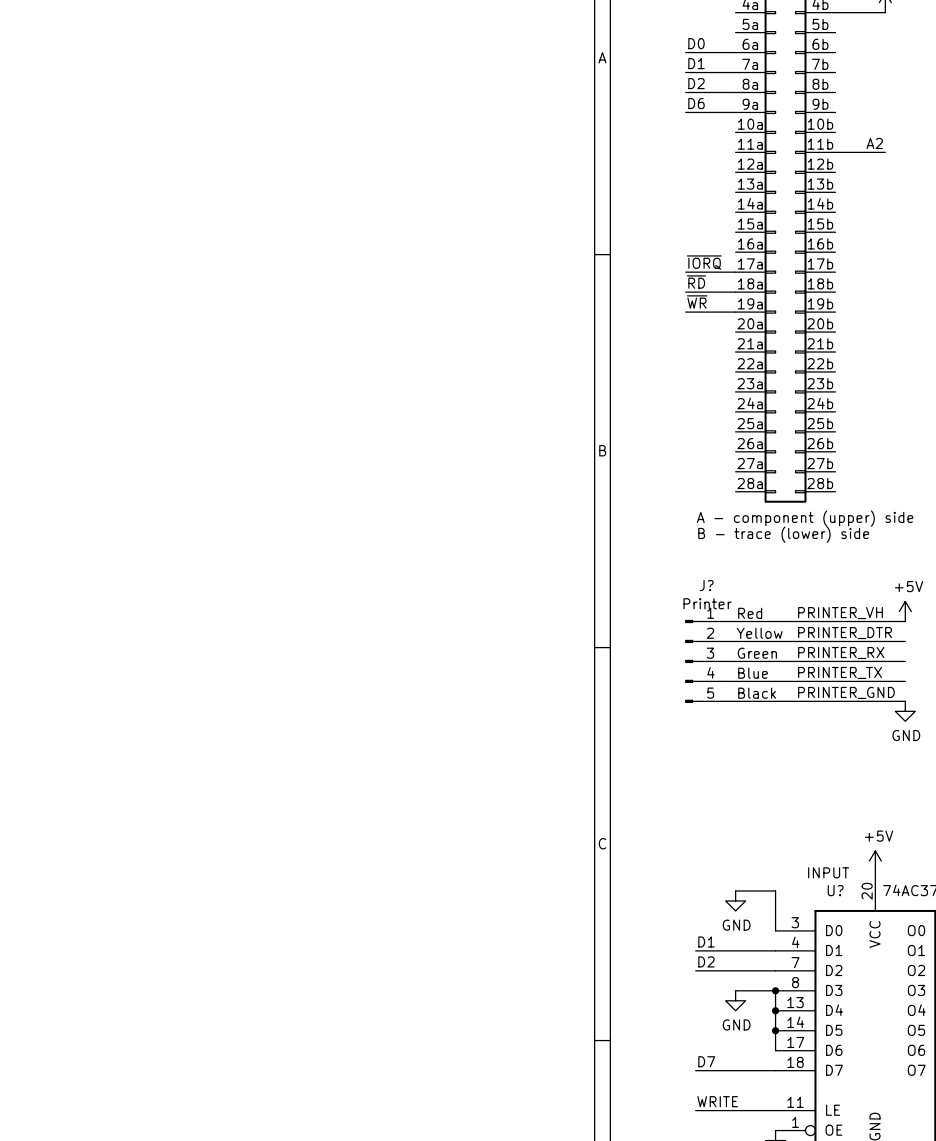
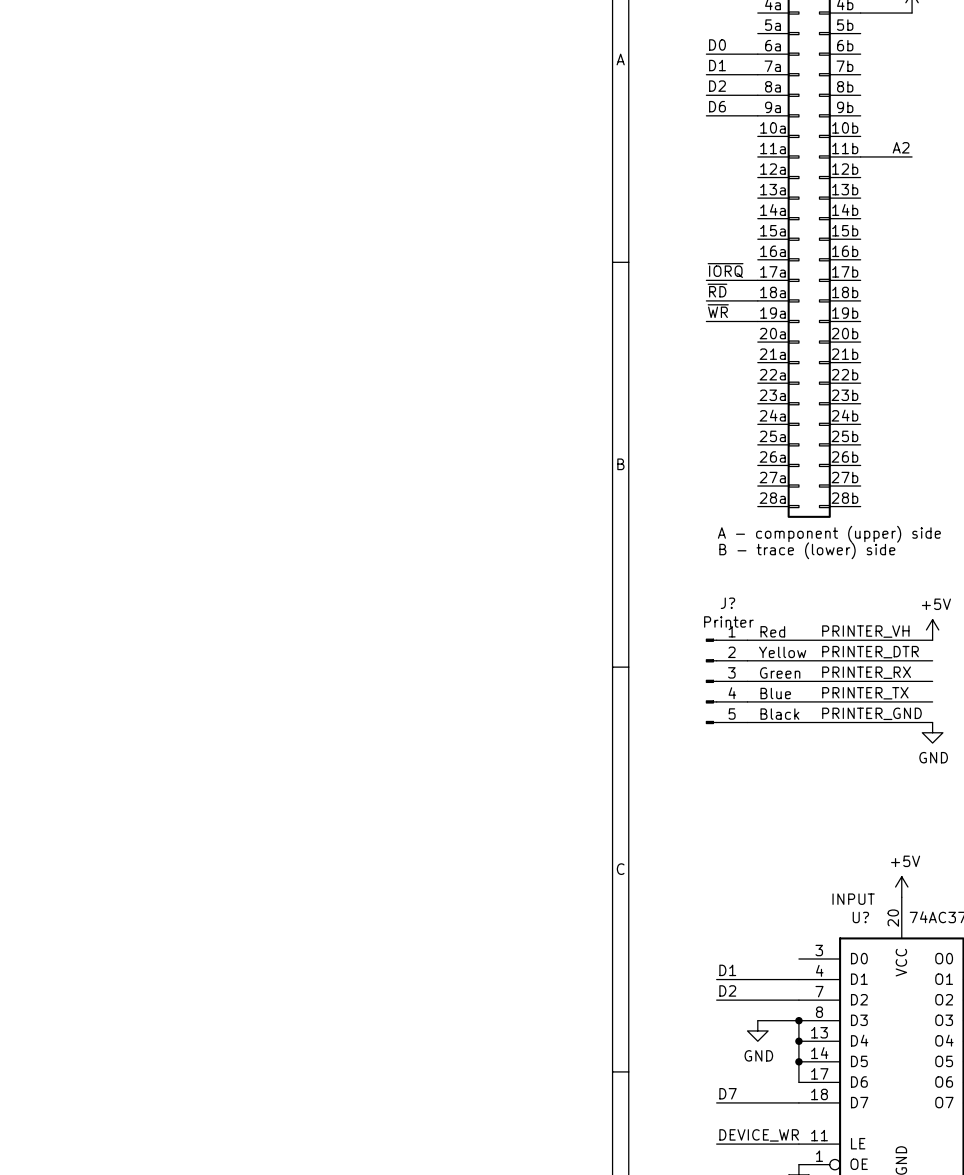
wire: (735, 891) (775, 891) (775, 930) -> none
power symbol: GND (735, 900) -> none
label: WRITE (717, 1101) -> DEVICE_WR (759, 1135)

